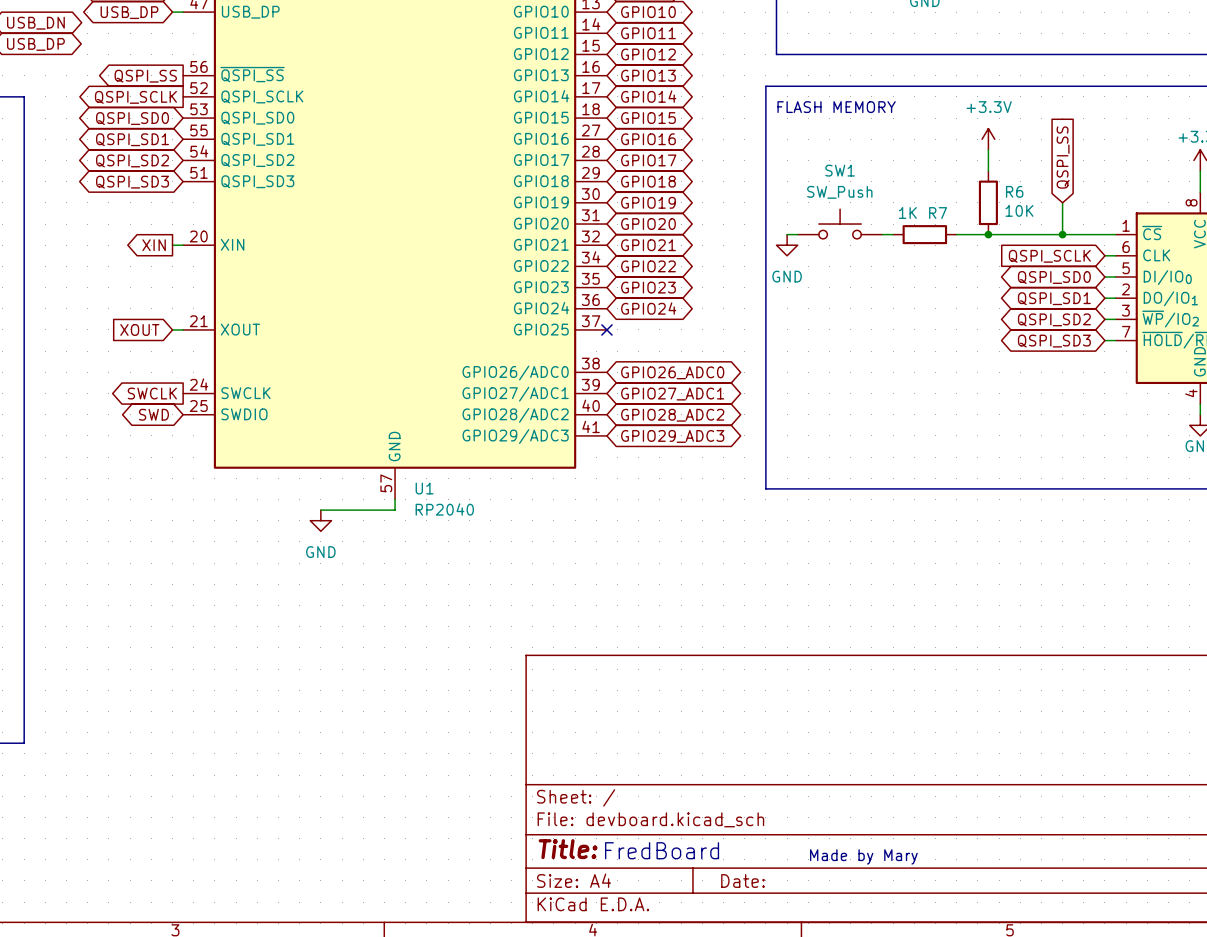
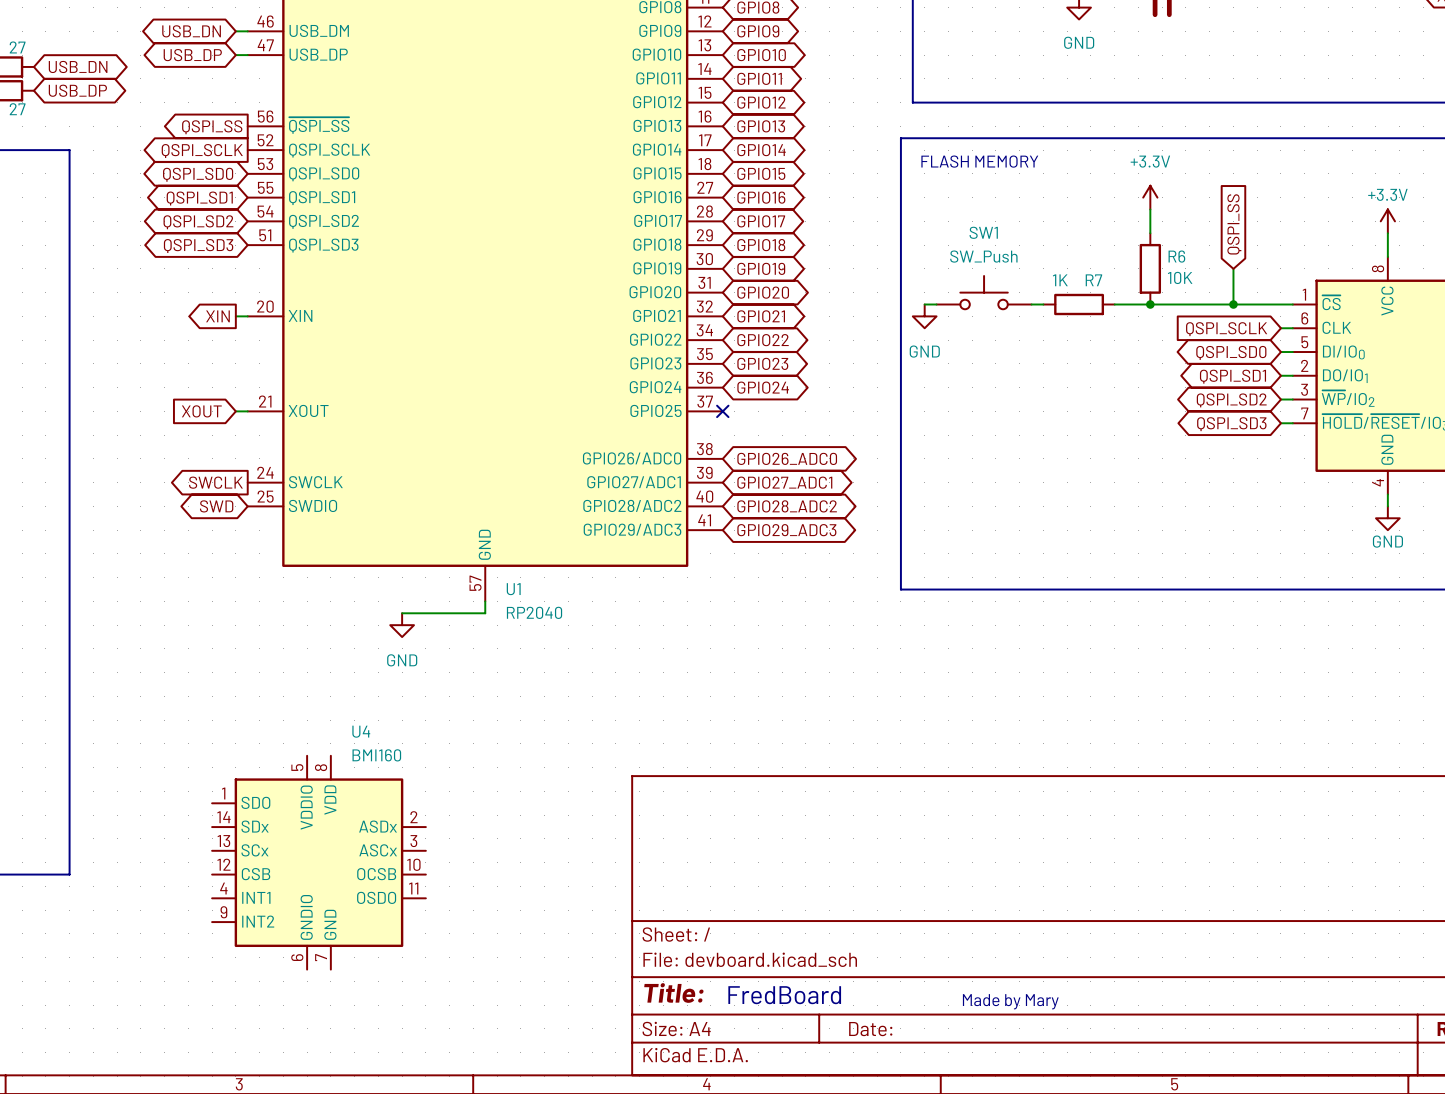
U4: none -> BMI160 (318, 862)

